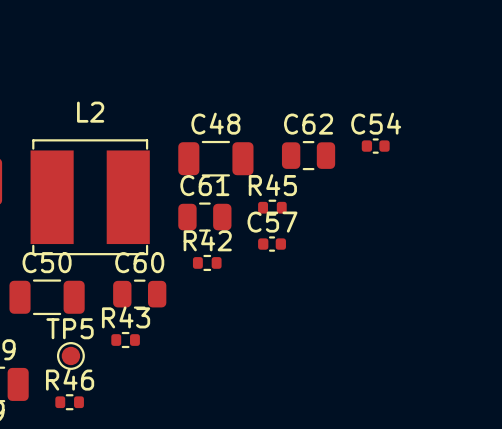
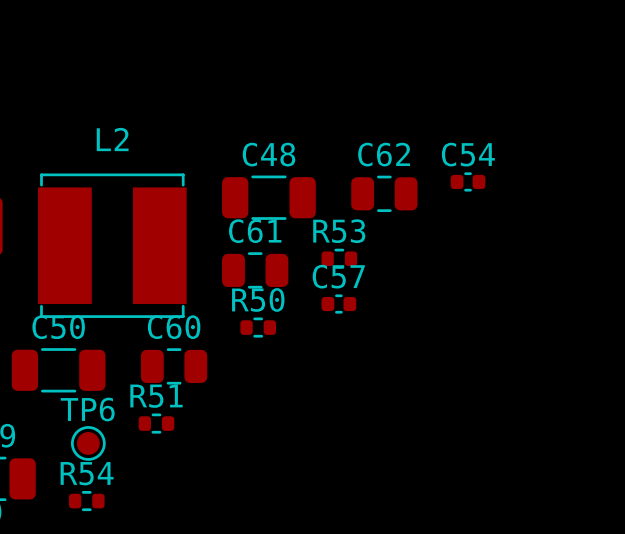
R45 name: R45 (272, 185) -> R53 (339, 231)
R42 name: R42 (207, 240) -> R50 (258, 299)
R43 name: R43 (126, 317) -> R51 (156, 396)
TP5 name: TP5 (70, 328) -> TP6 (87, 409)
R46 name: R46 (70, 379) -> R54 (87, 473)

